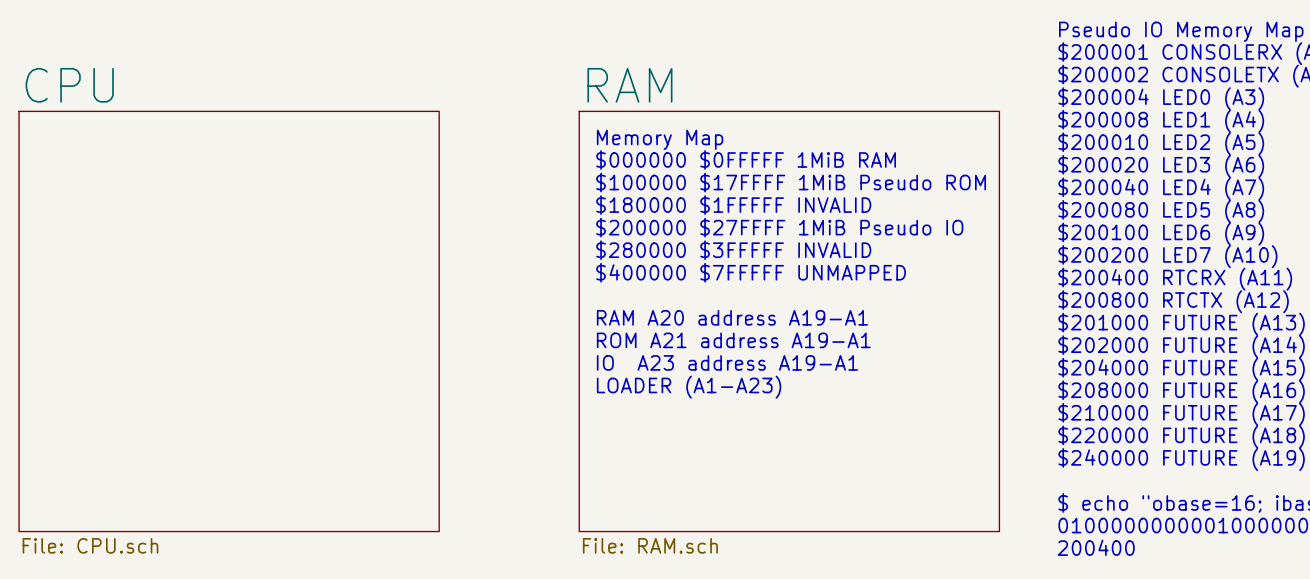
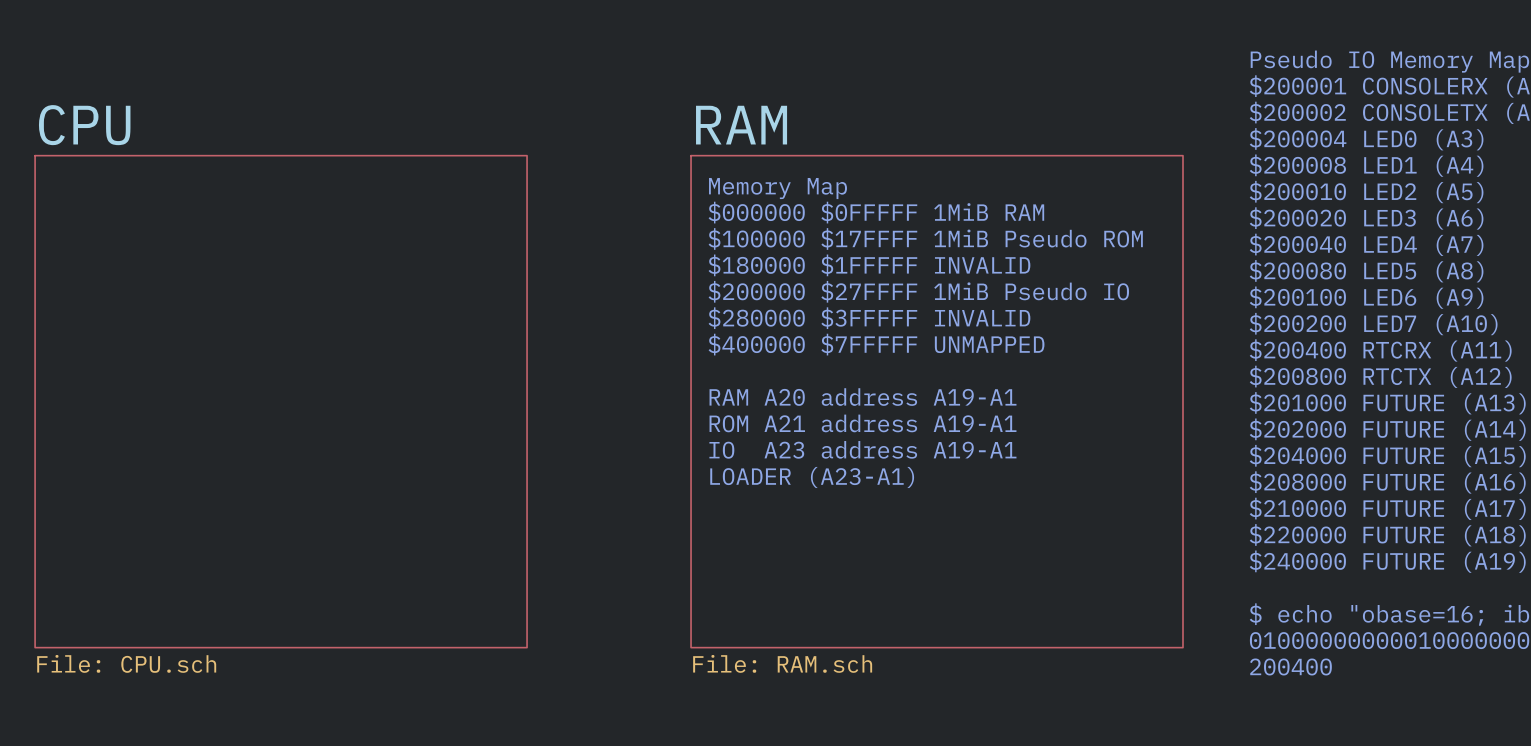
text: LOADER (A1-A23) (689, 387) -> LOADER (A23-A1) (812, 477)

